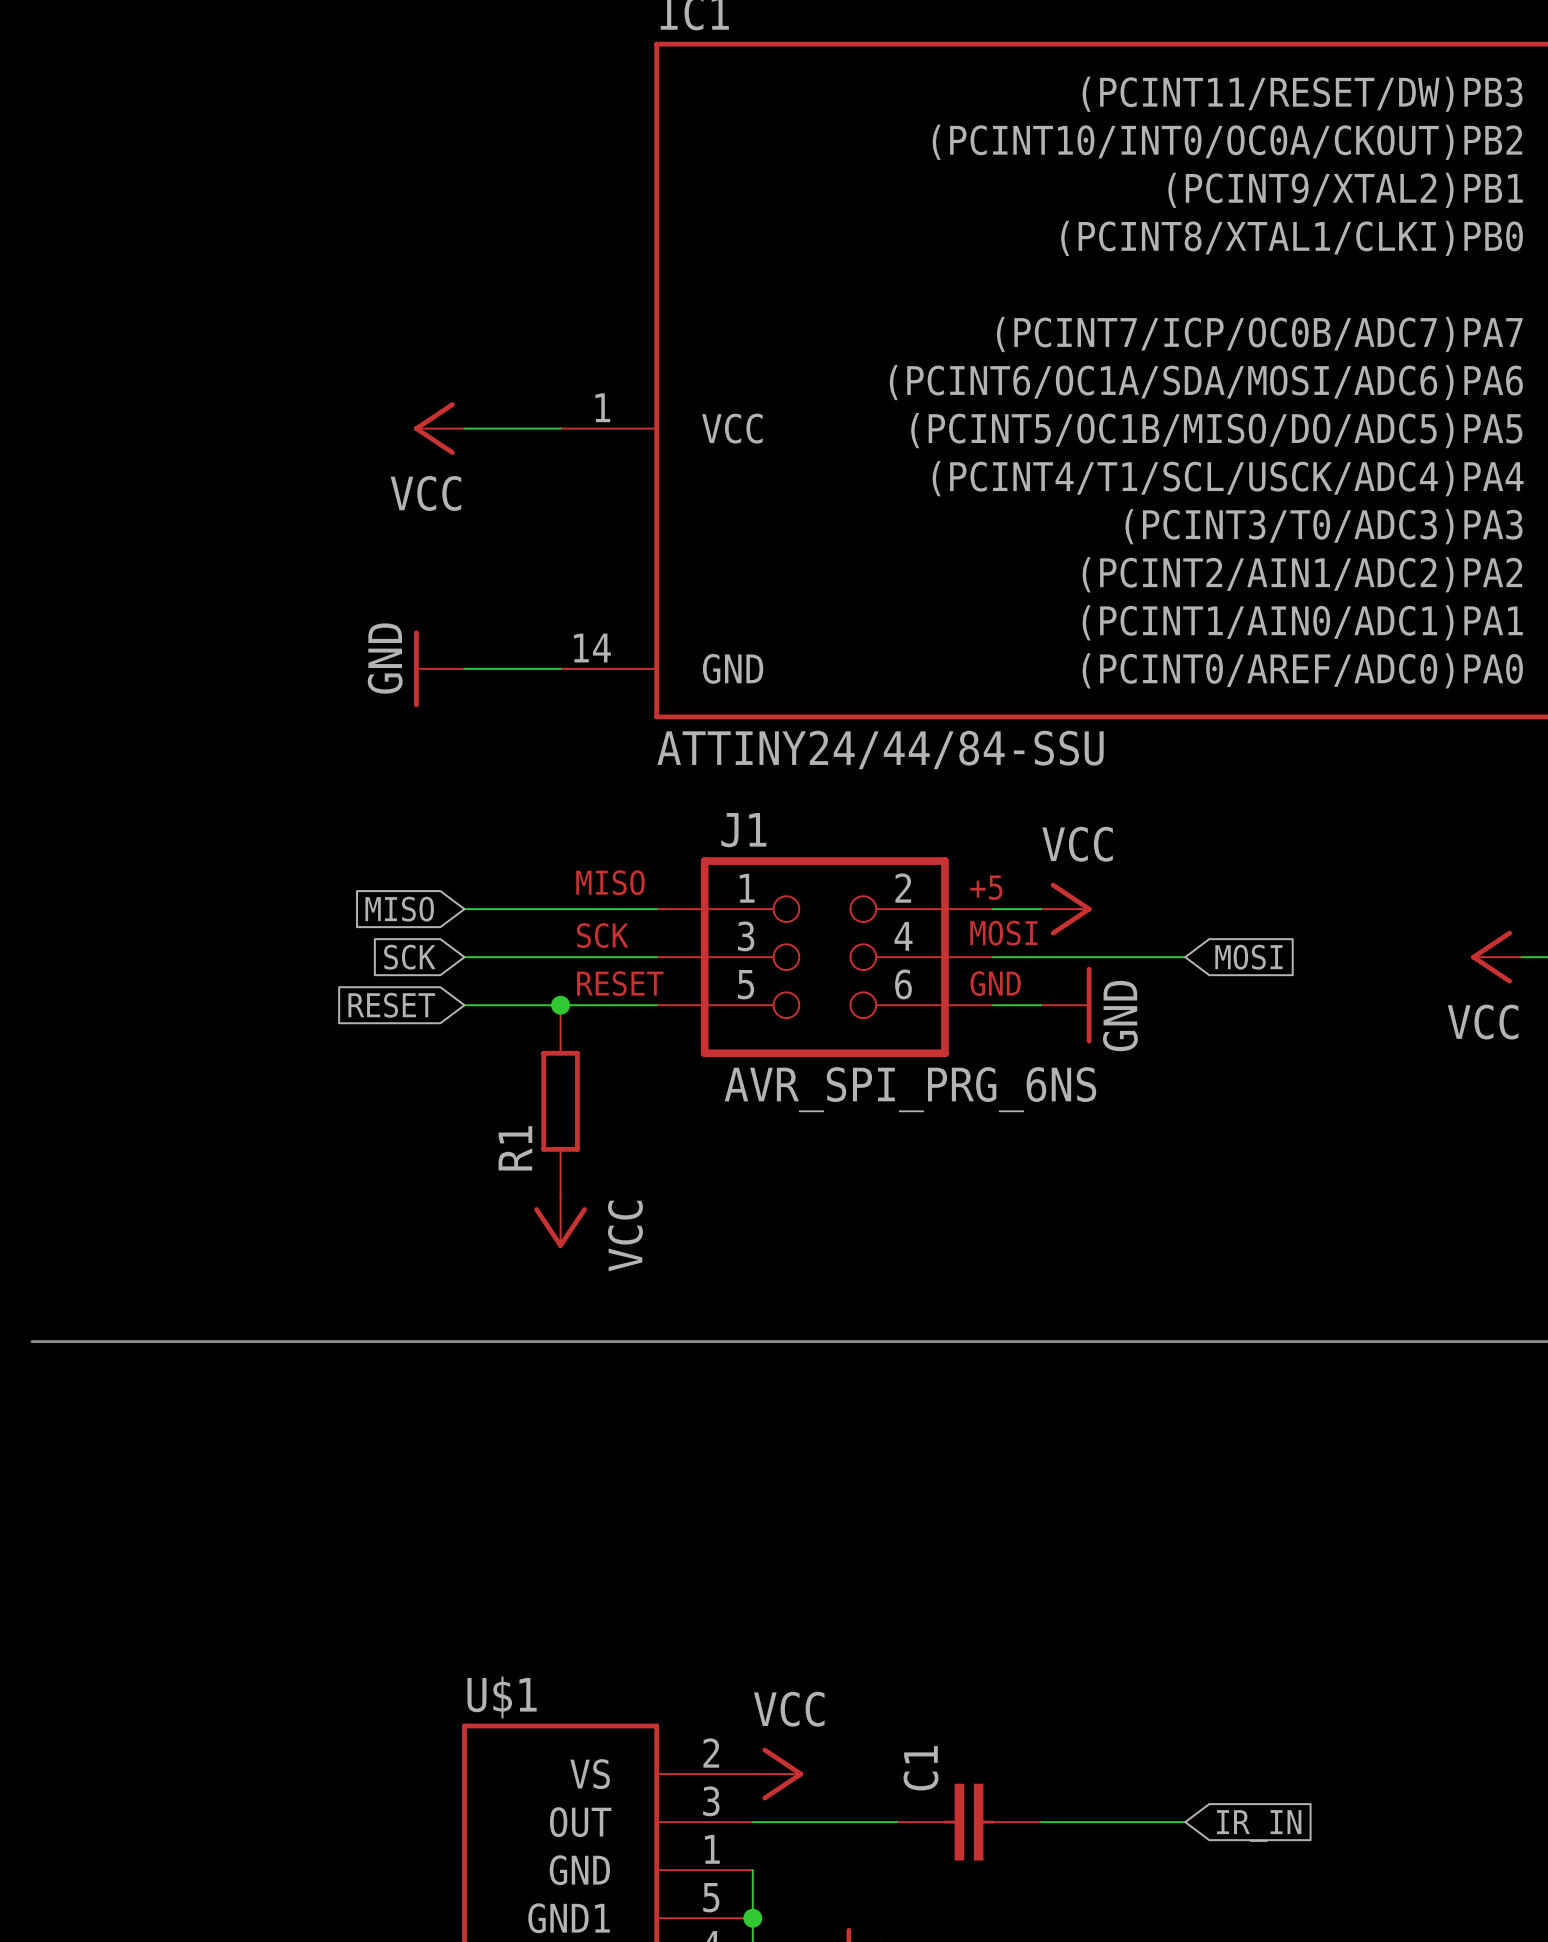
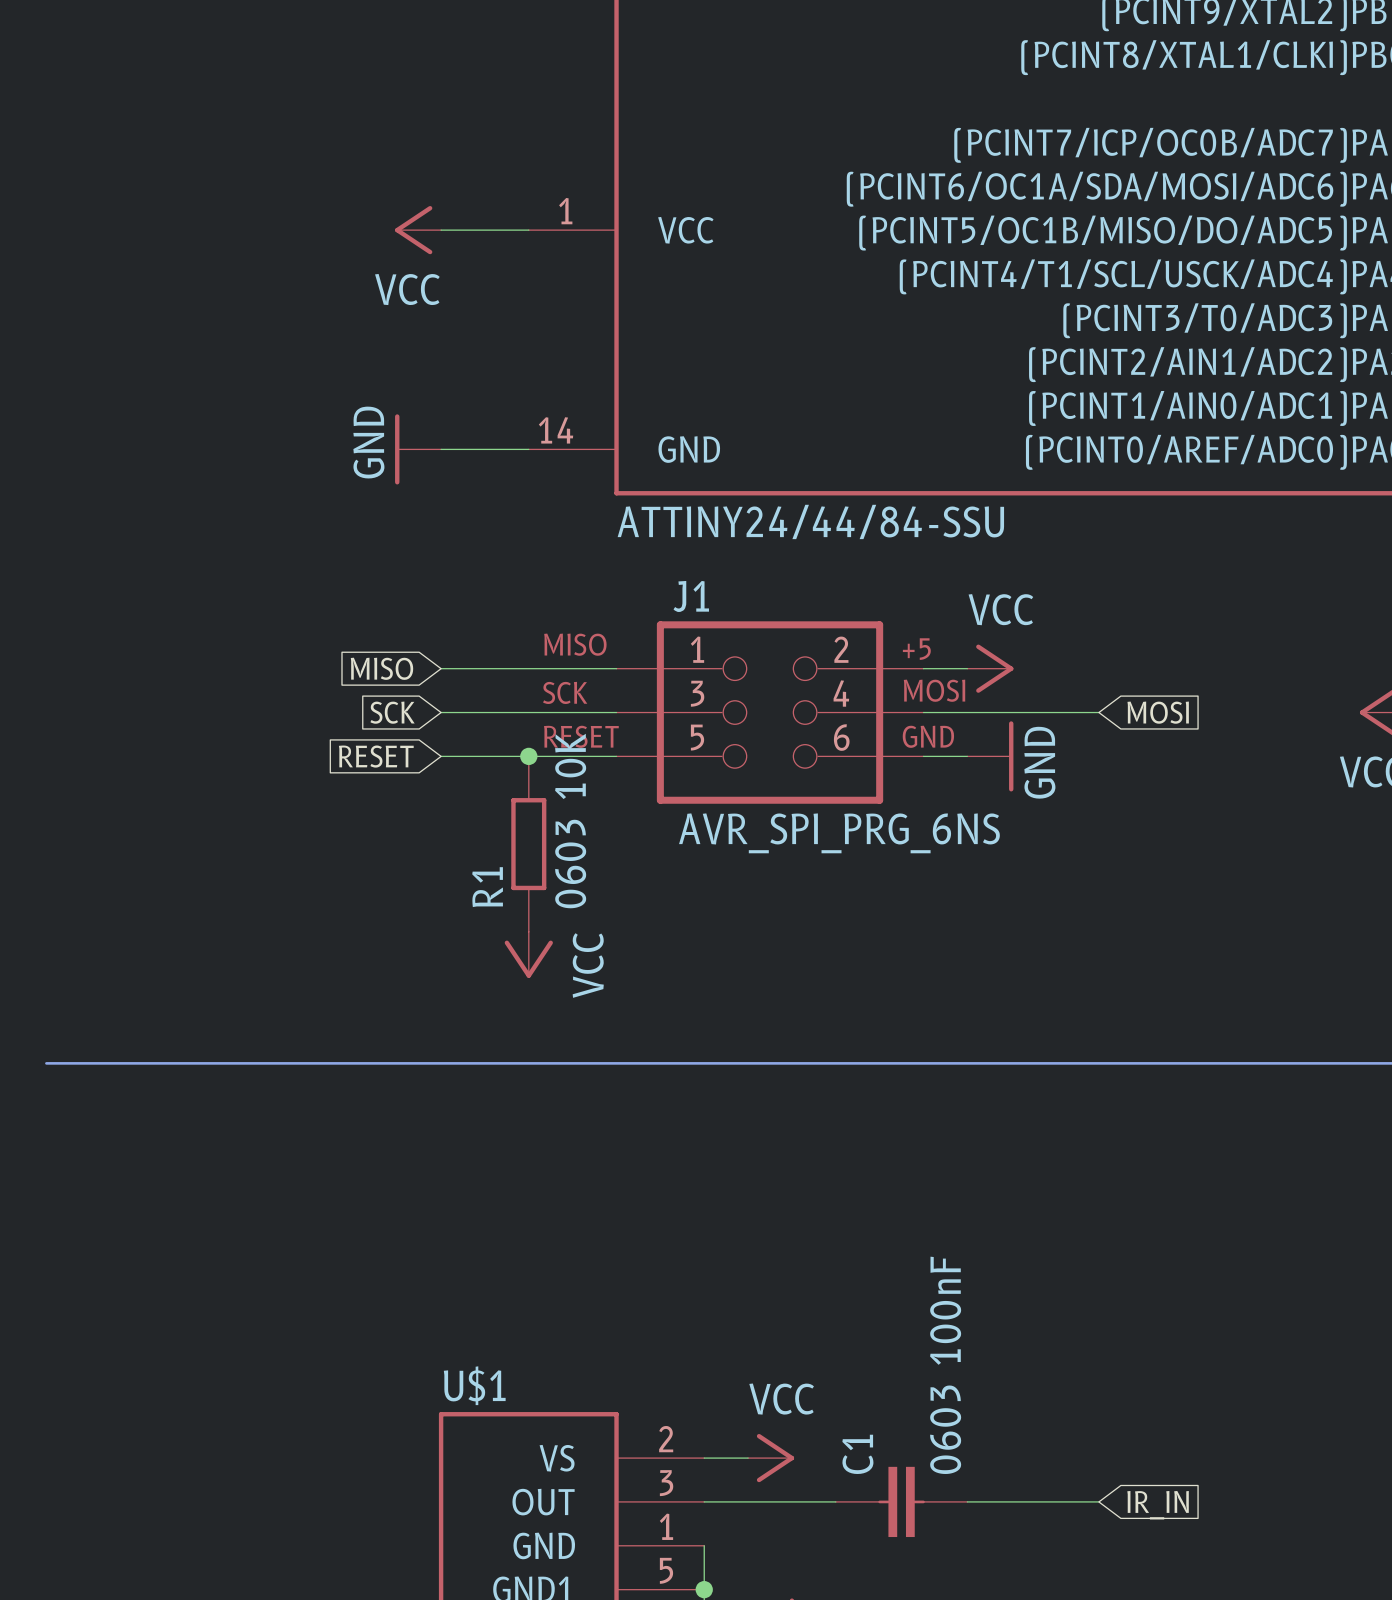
R1 value: none -> 0603 10K (570, 821)
C1 value: none -> 0603 100nF (945, 1365)
power symbol position: VCC (778, 1774) -> VCC (771, 1458)

